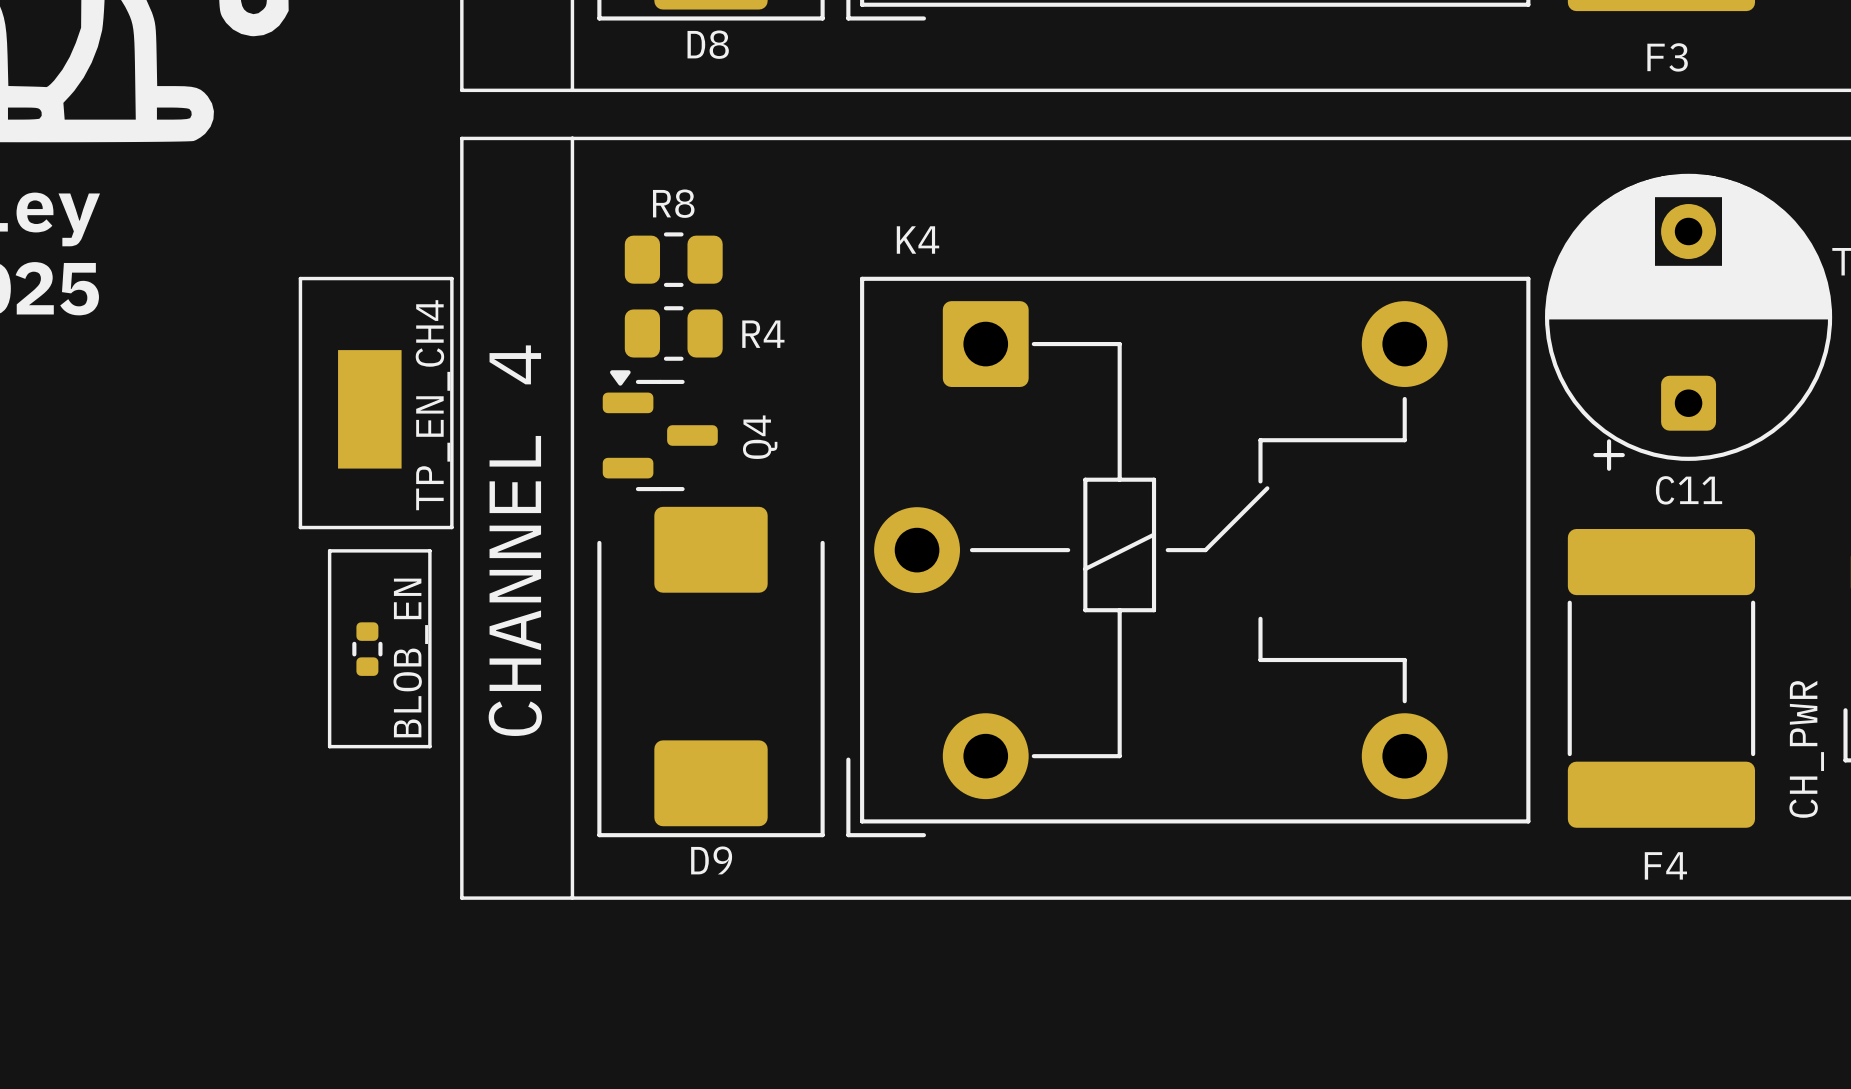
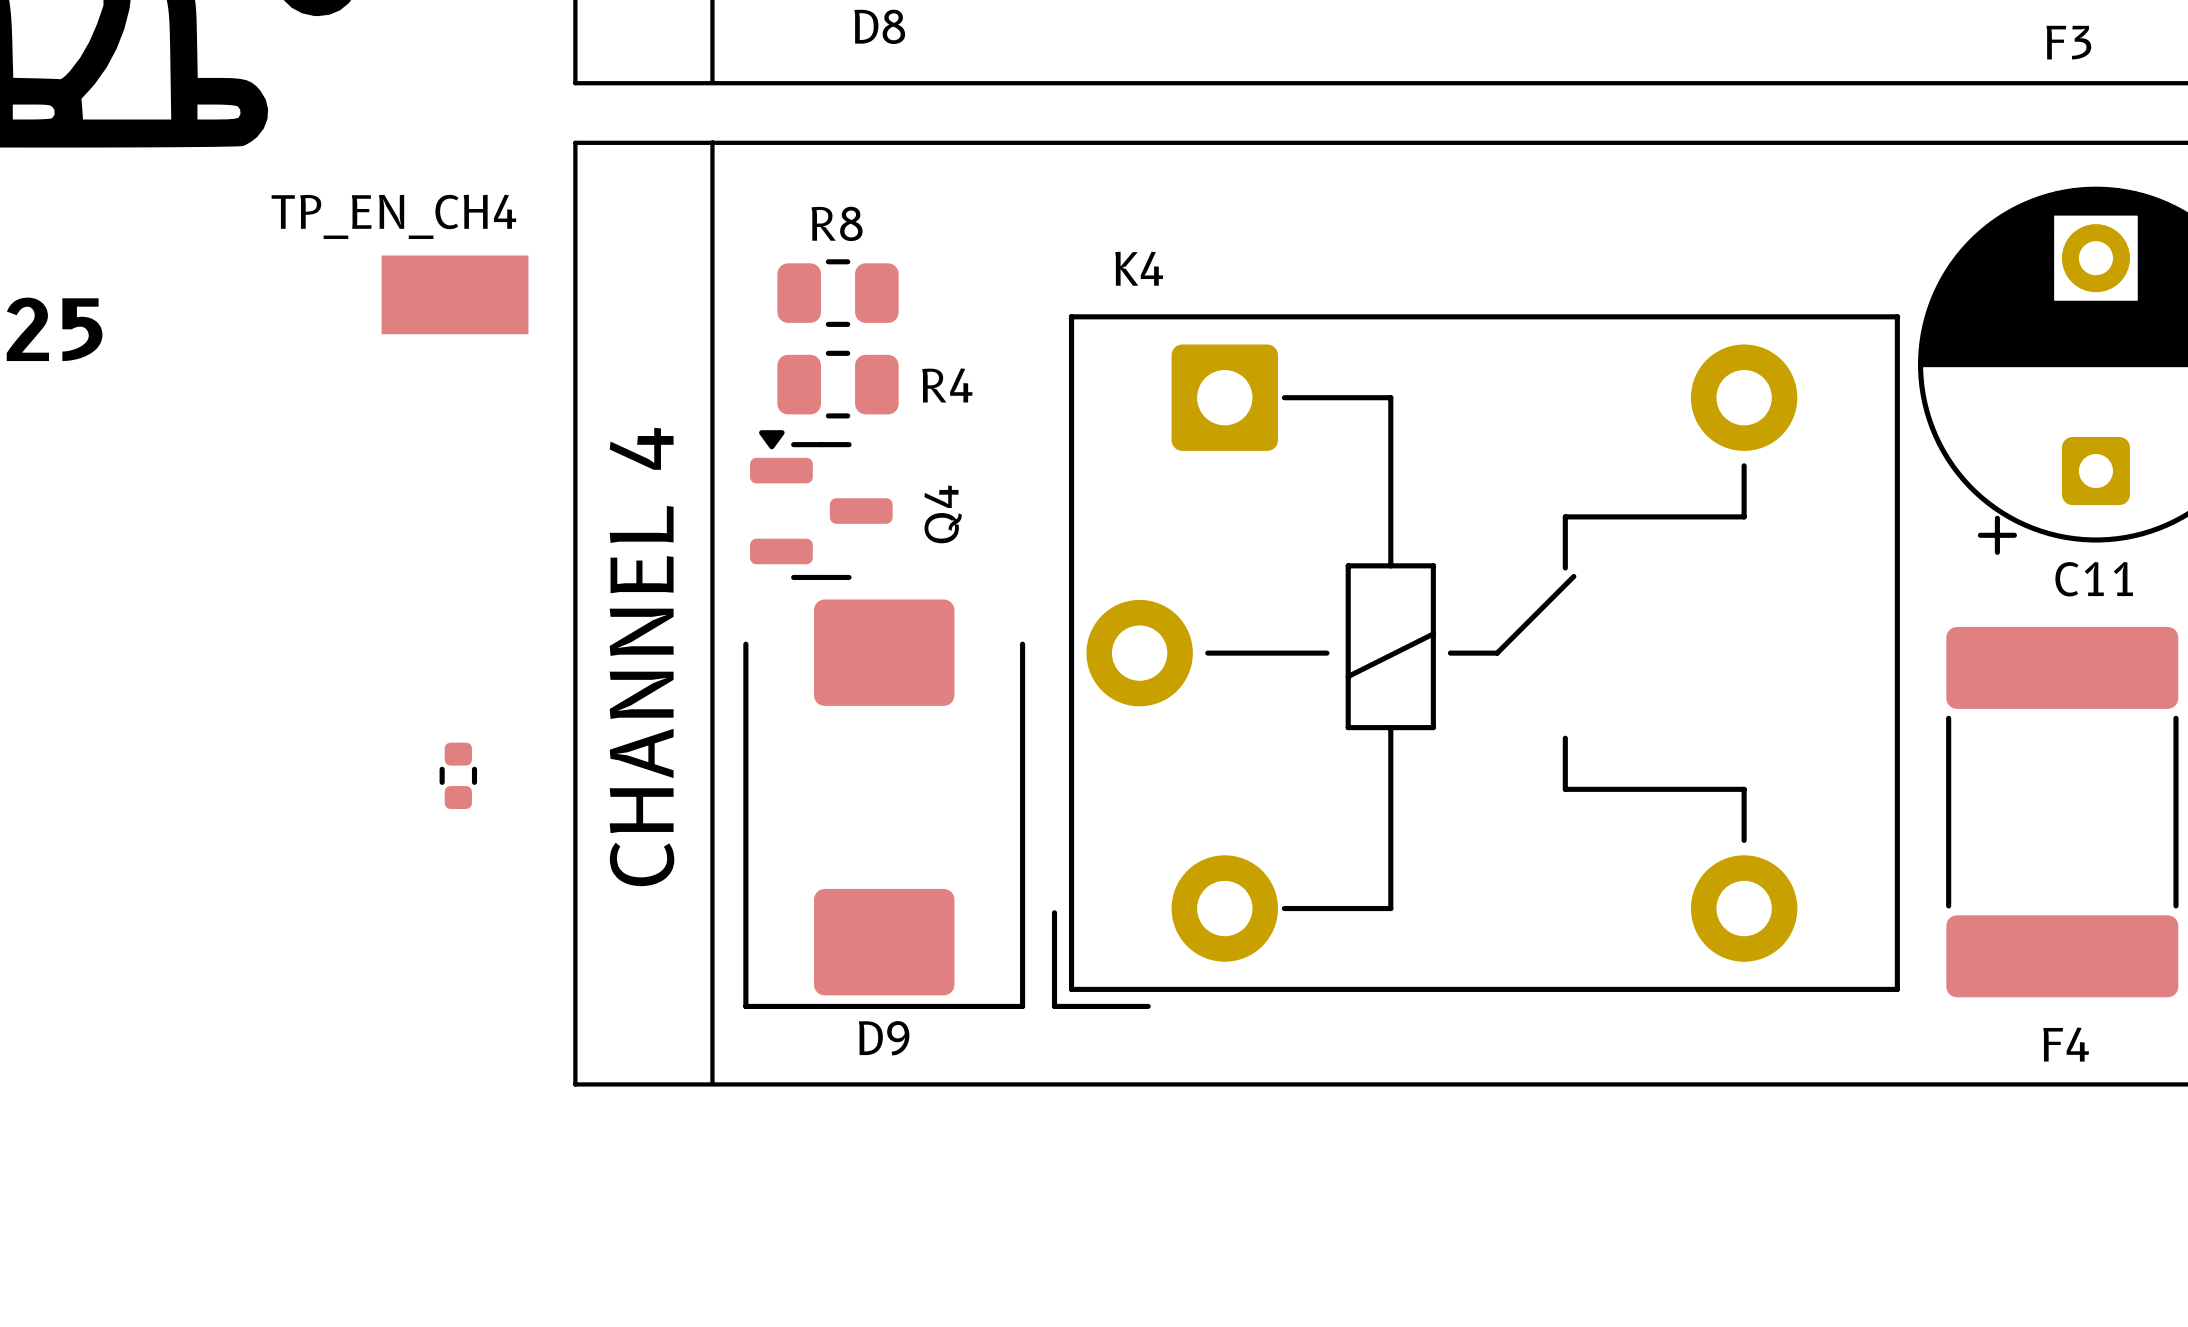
line: (300, 278) (451, 278) (451, 527) (300, 527) (300, 278) -> none
TP_EN_CH4 name position: TP_EN_CH4 (433, 405) -> TP_EN_CH4 (393, 216)
TP_EN_CH4 rotation: 0° (369, 409) -> 90° clockwise (454, 294)
TP_EN_CH4 position: (369, 409) -> (454, 294)
line: (329, 550) (429, 550) (429, 746) (329, 746) (329, 550) -> none
text: BLOB_EN (410, 657) -> none

